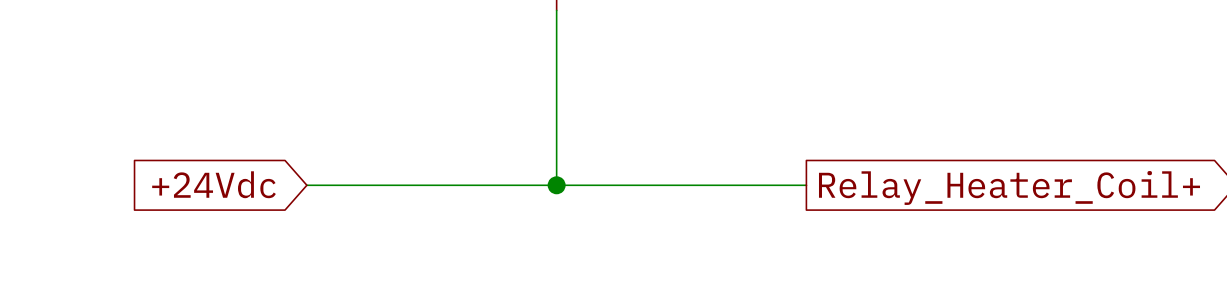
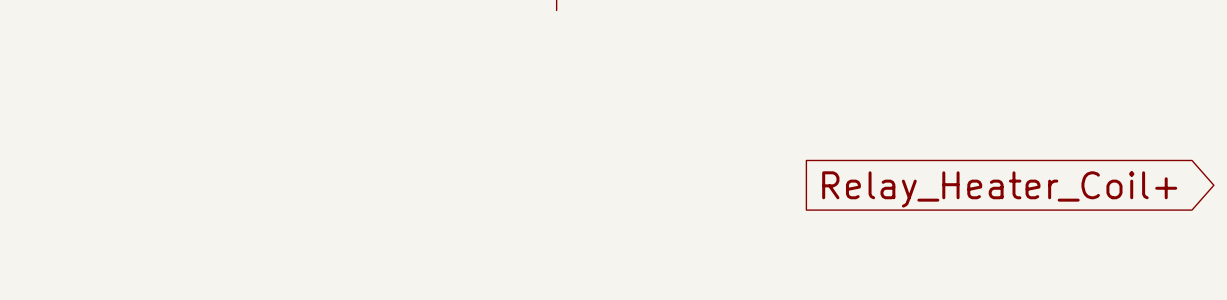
wire: (556, 10) (556, 185) -> none
global label: +24Vdc (213, 184) -> none
wire: (306, 185) (806, 185) -> none
junction: (556, 185) -> none

